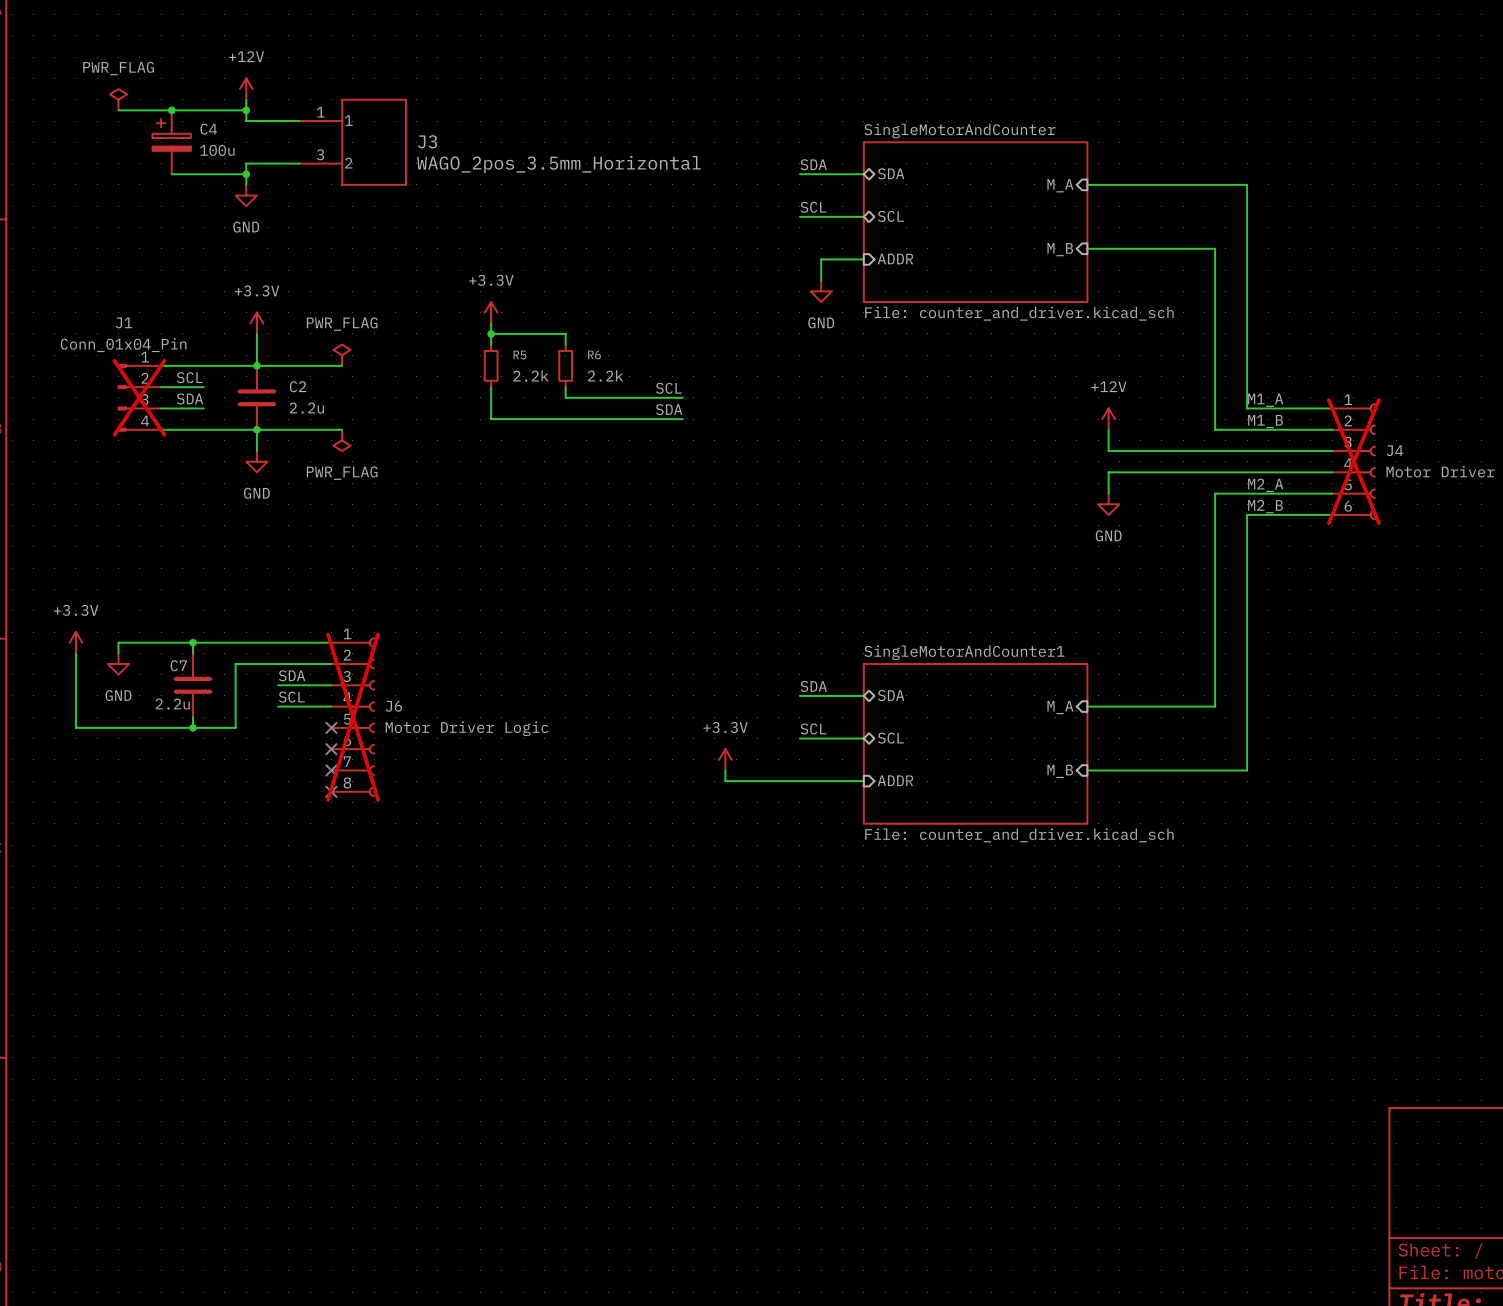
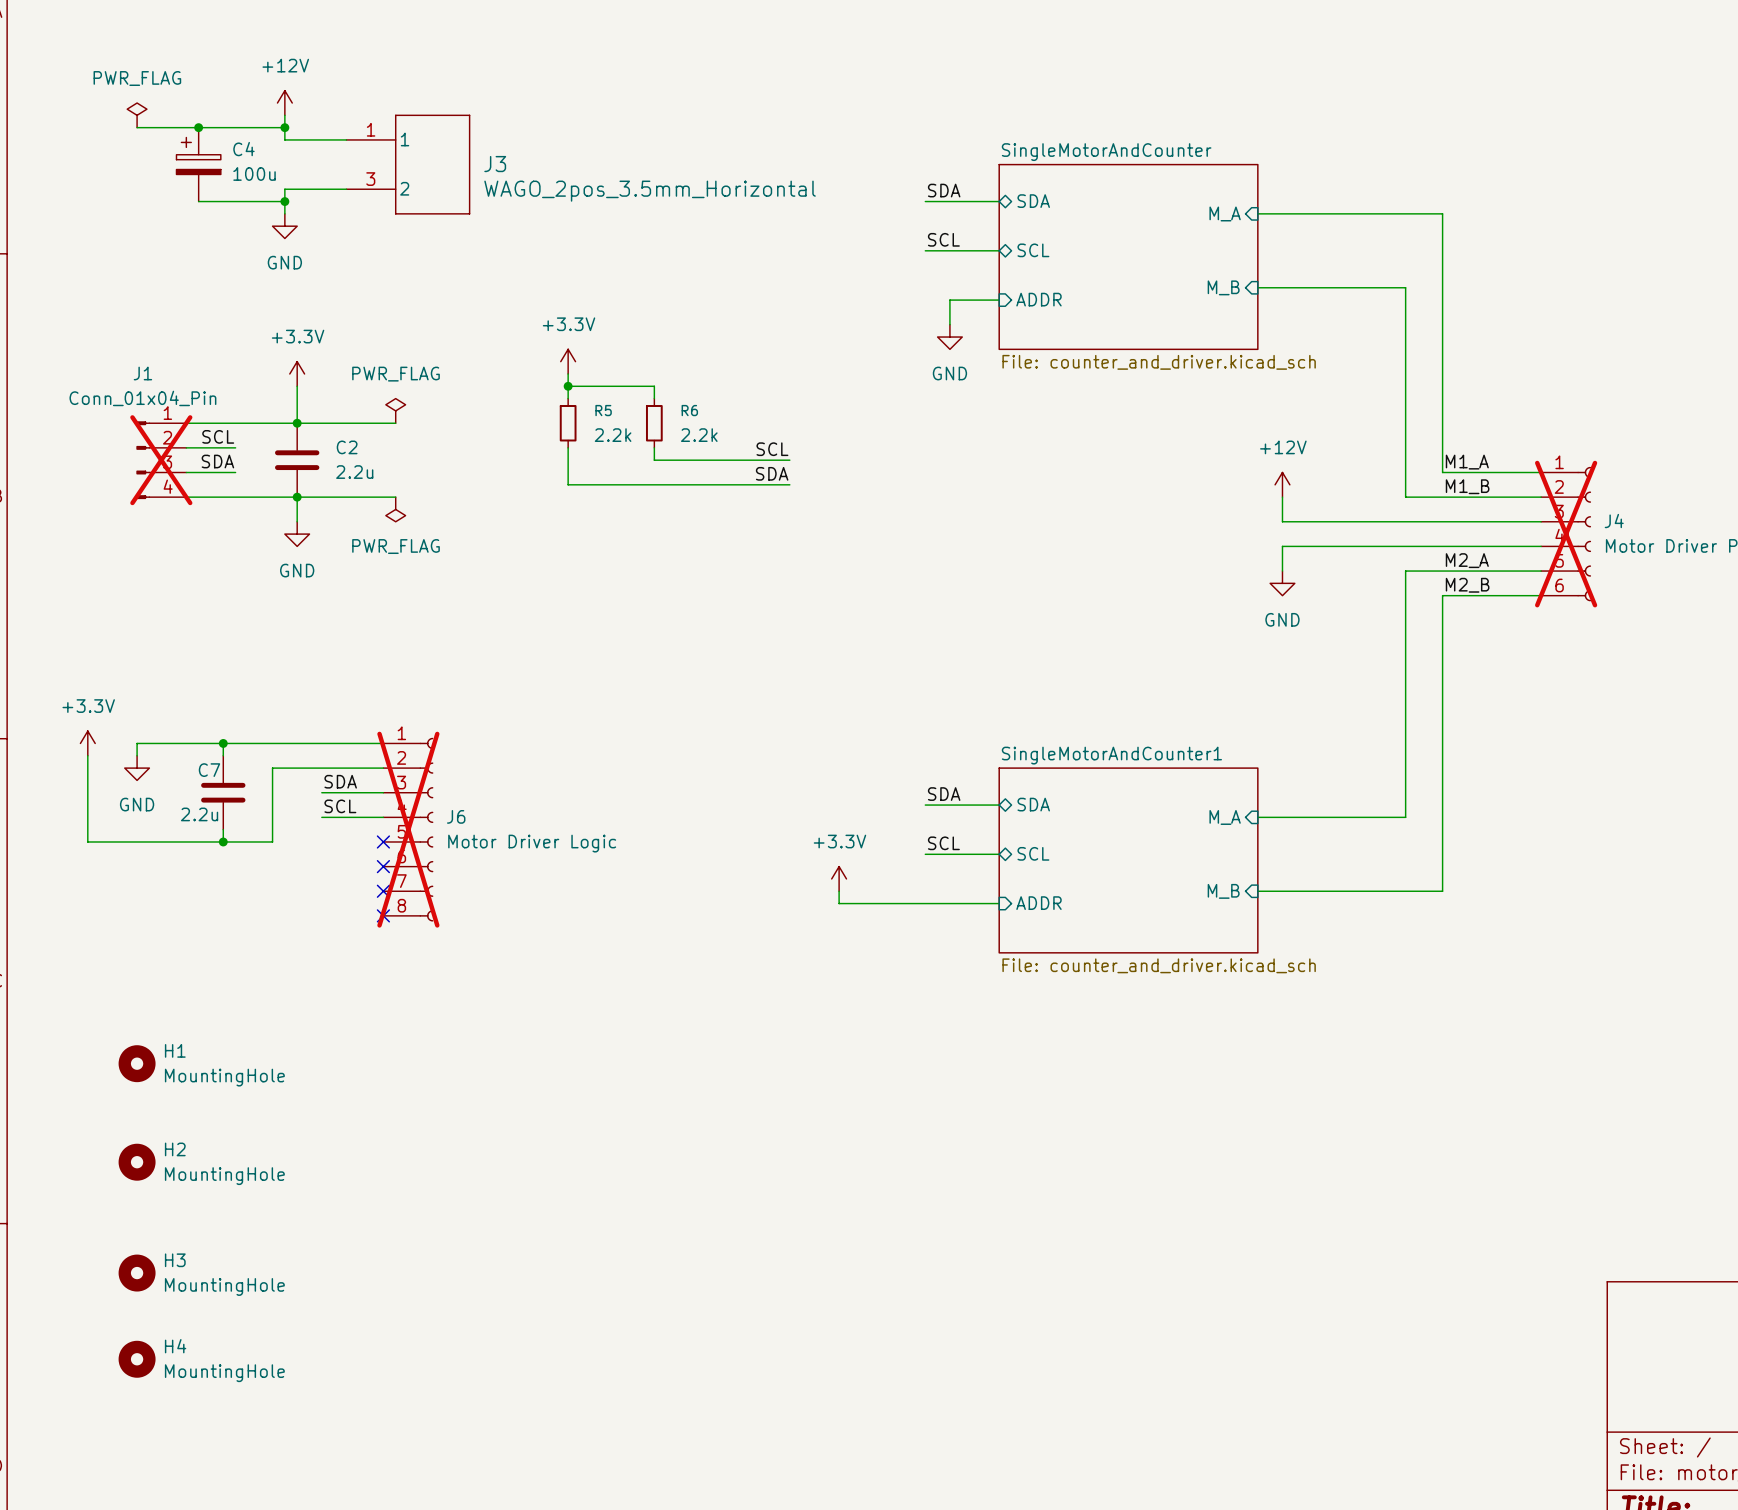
H1: none -> MountingHole (137, 1063)
H2: none -> MountingHole (137, 1162)
H3: none -> MountingHole (137, 1273)
H4: none -> MountingHole (137, 1359)

